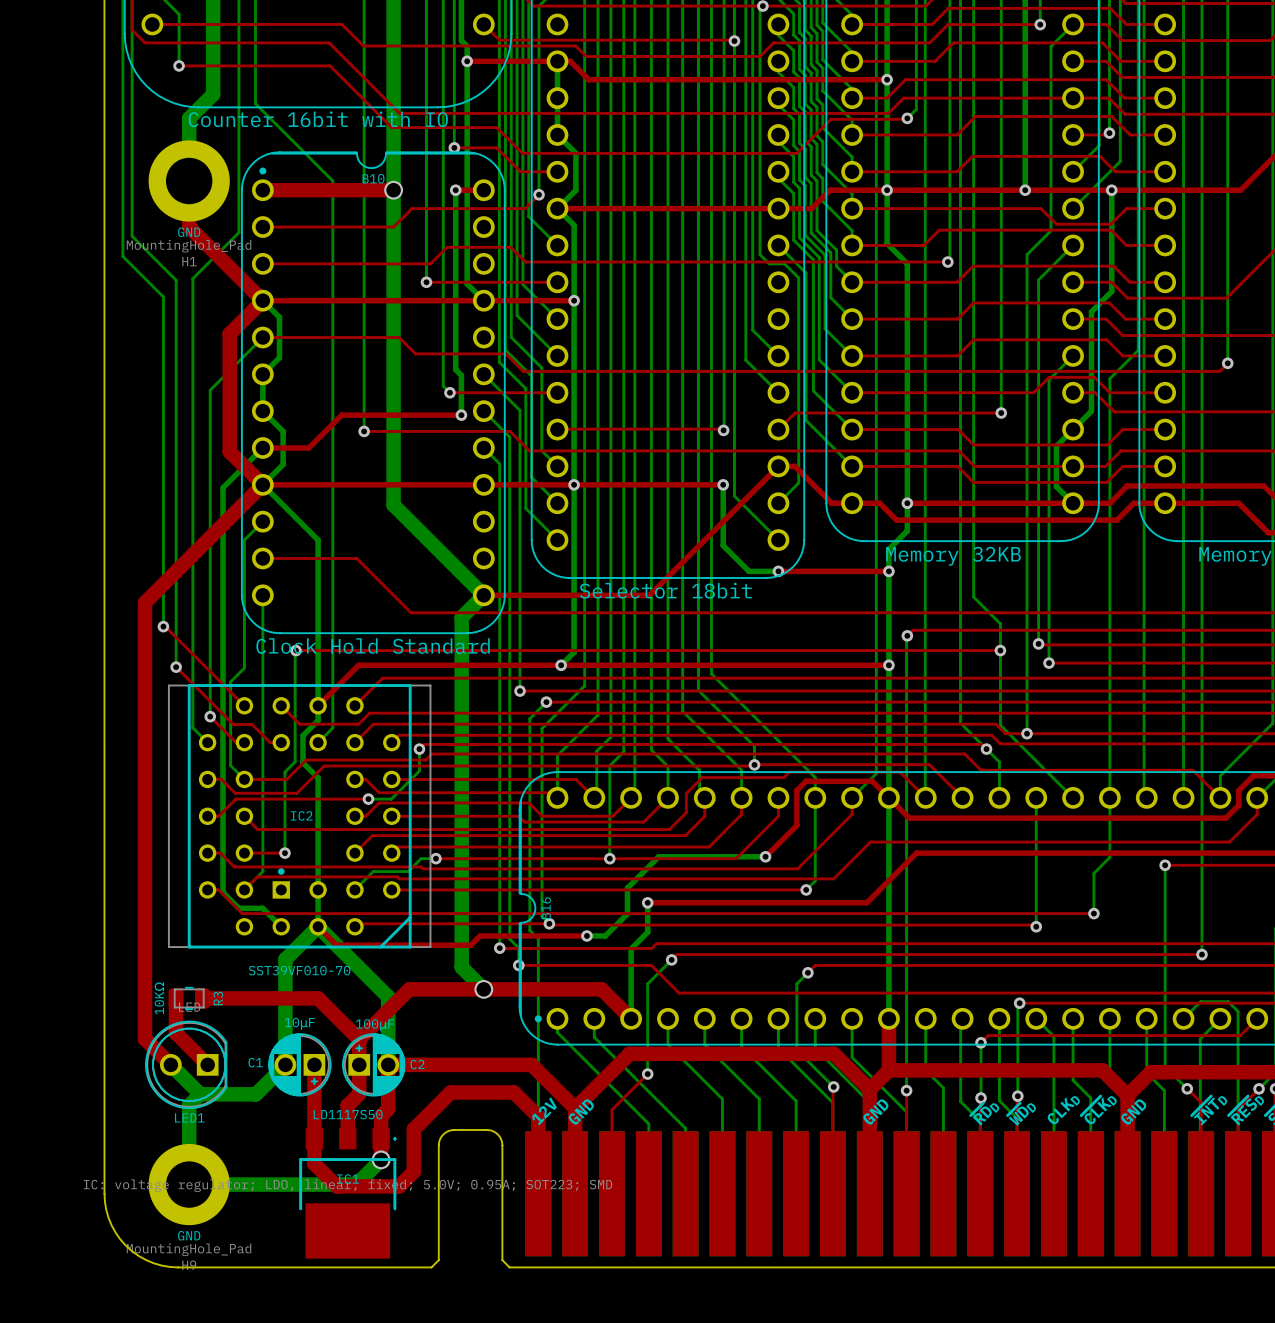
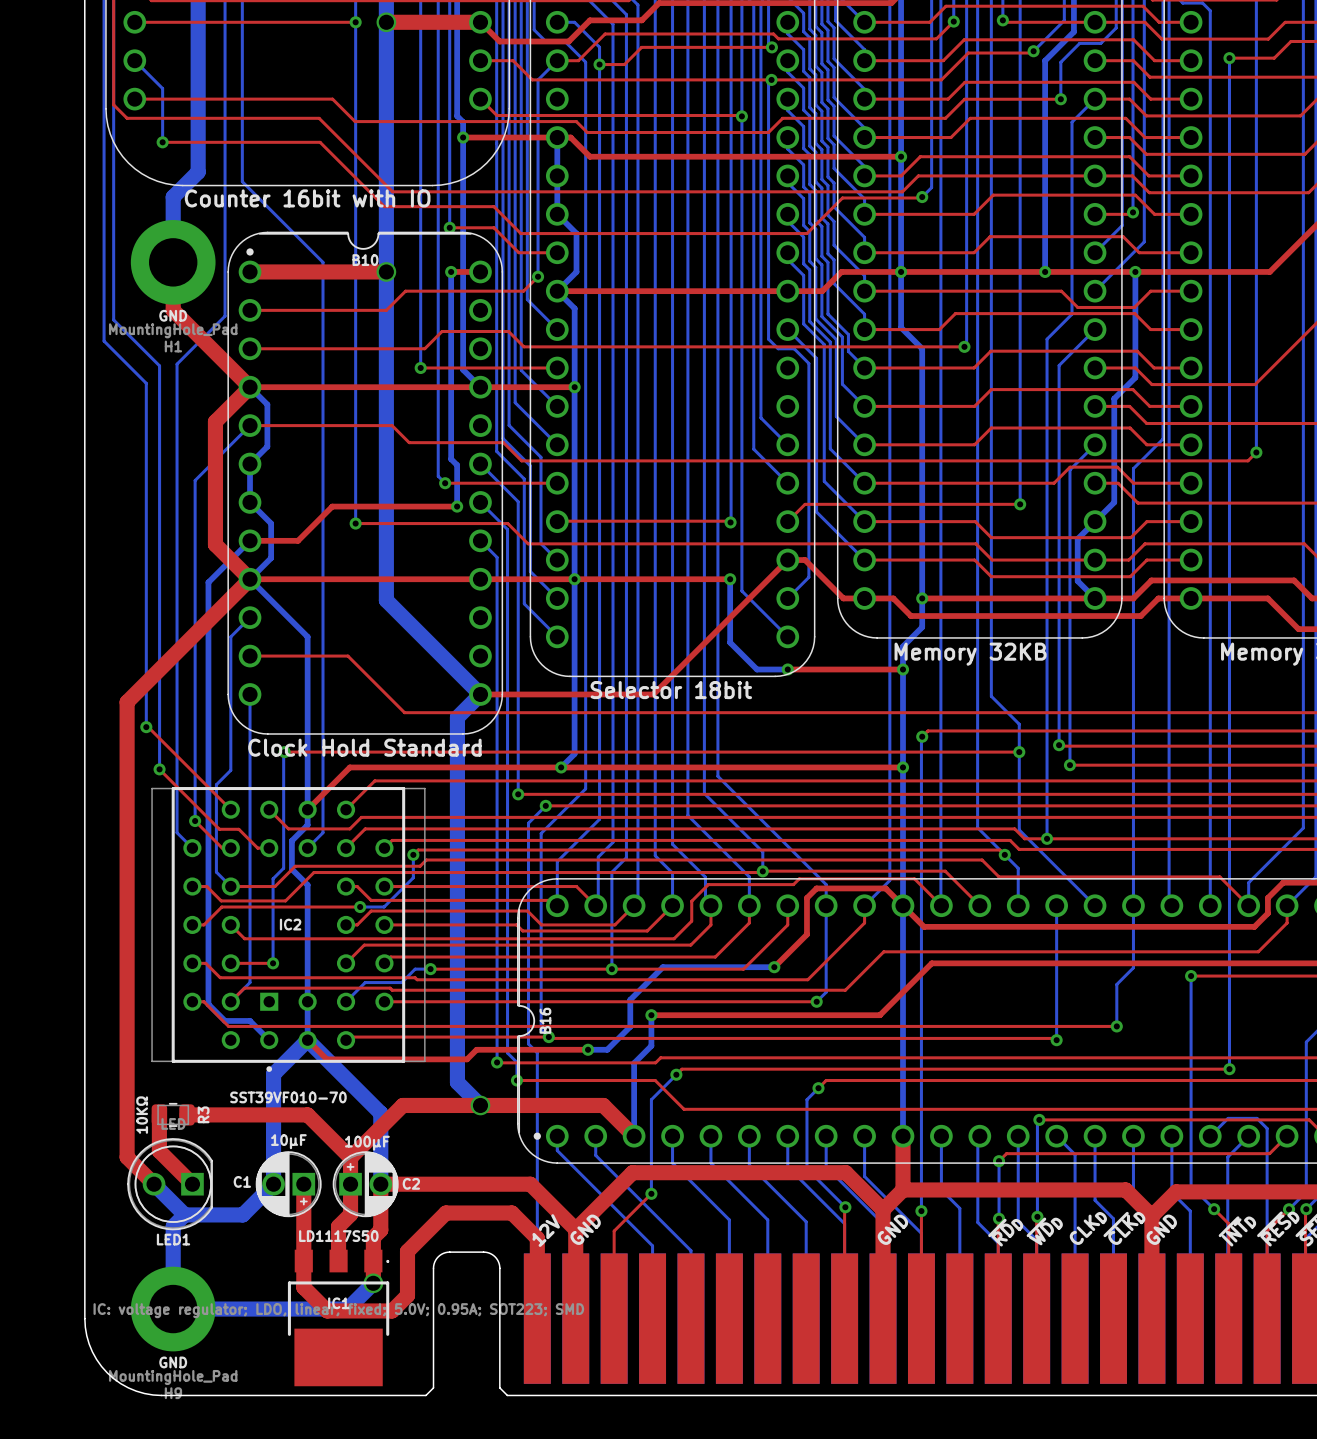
IC2 footprint: [168, 684, 432, 949] -> [151, 787, 426, 1072]

